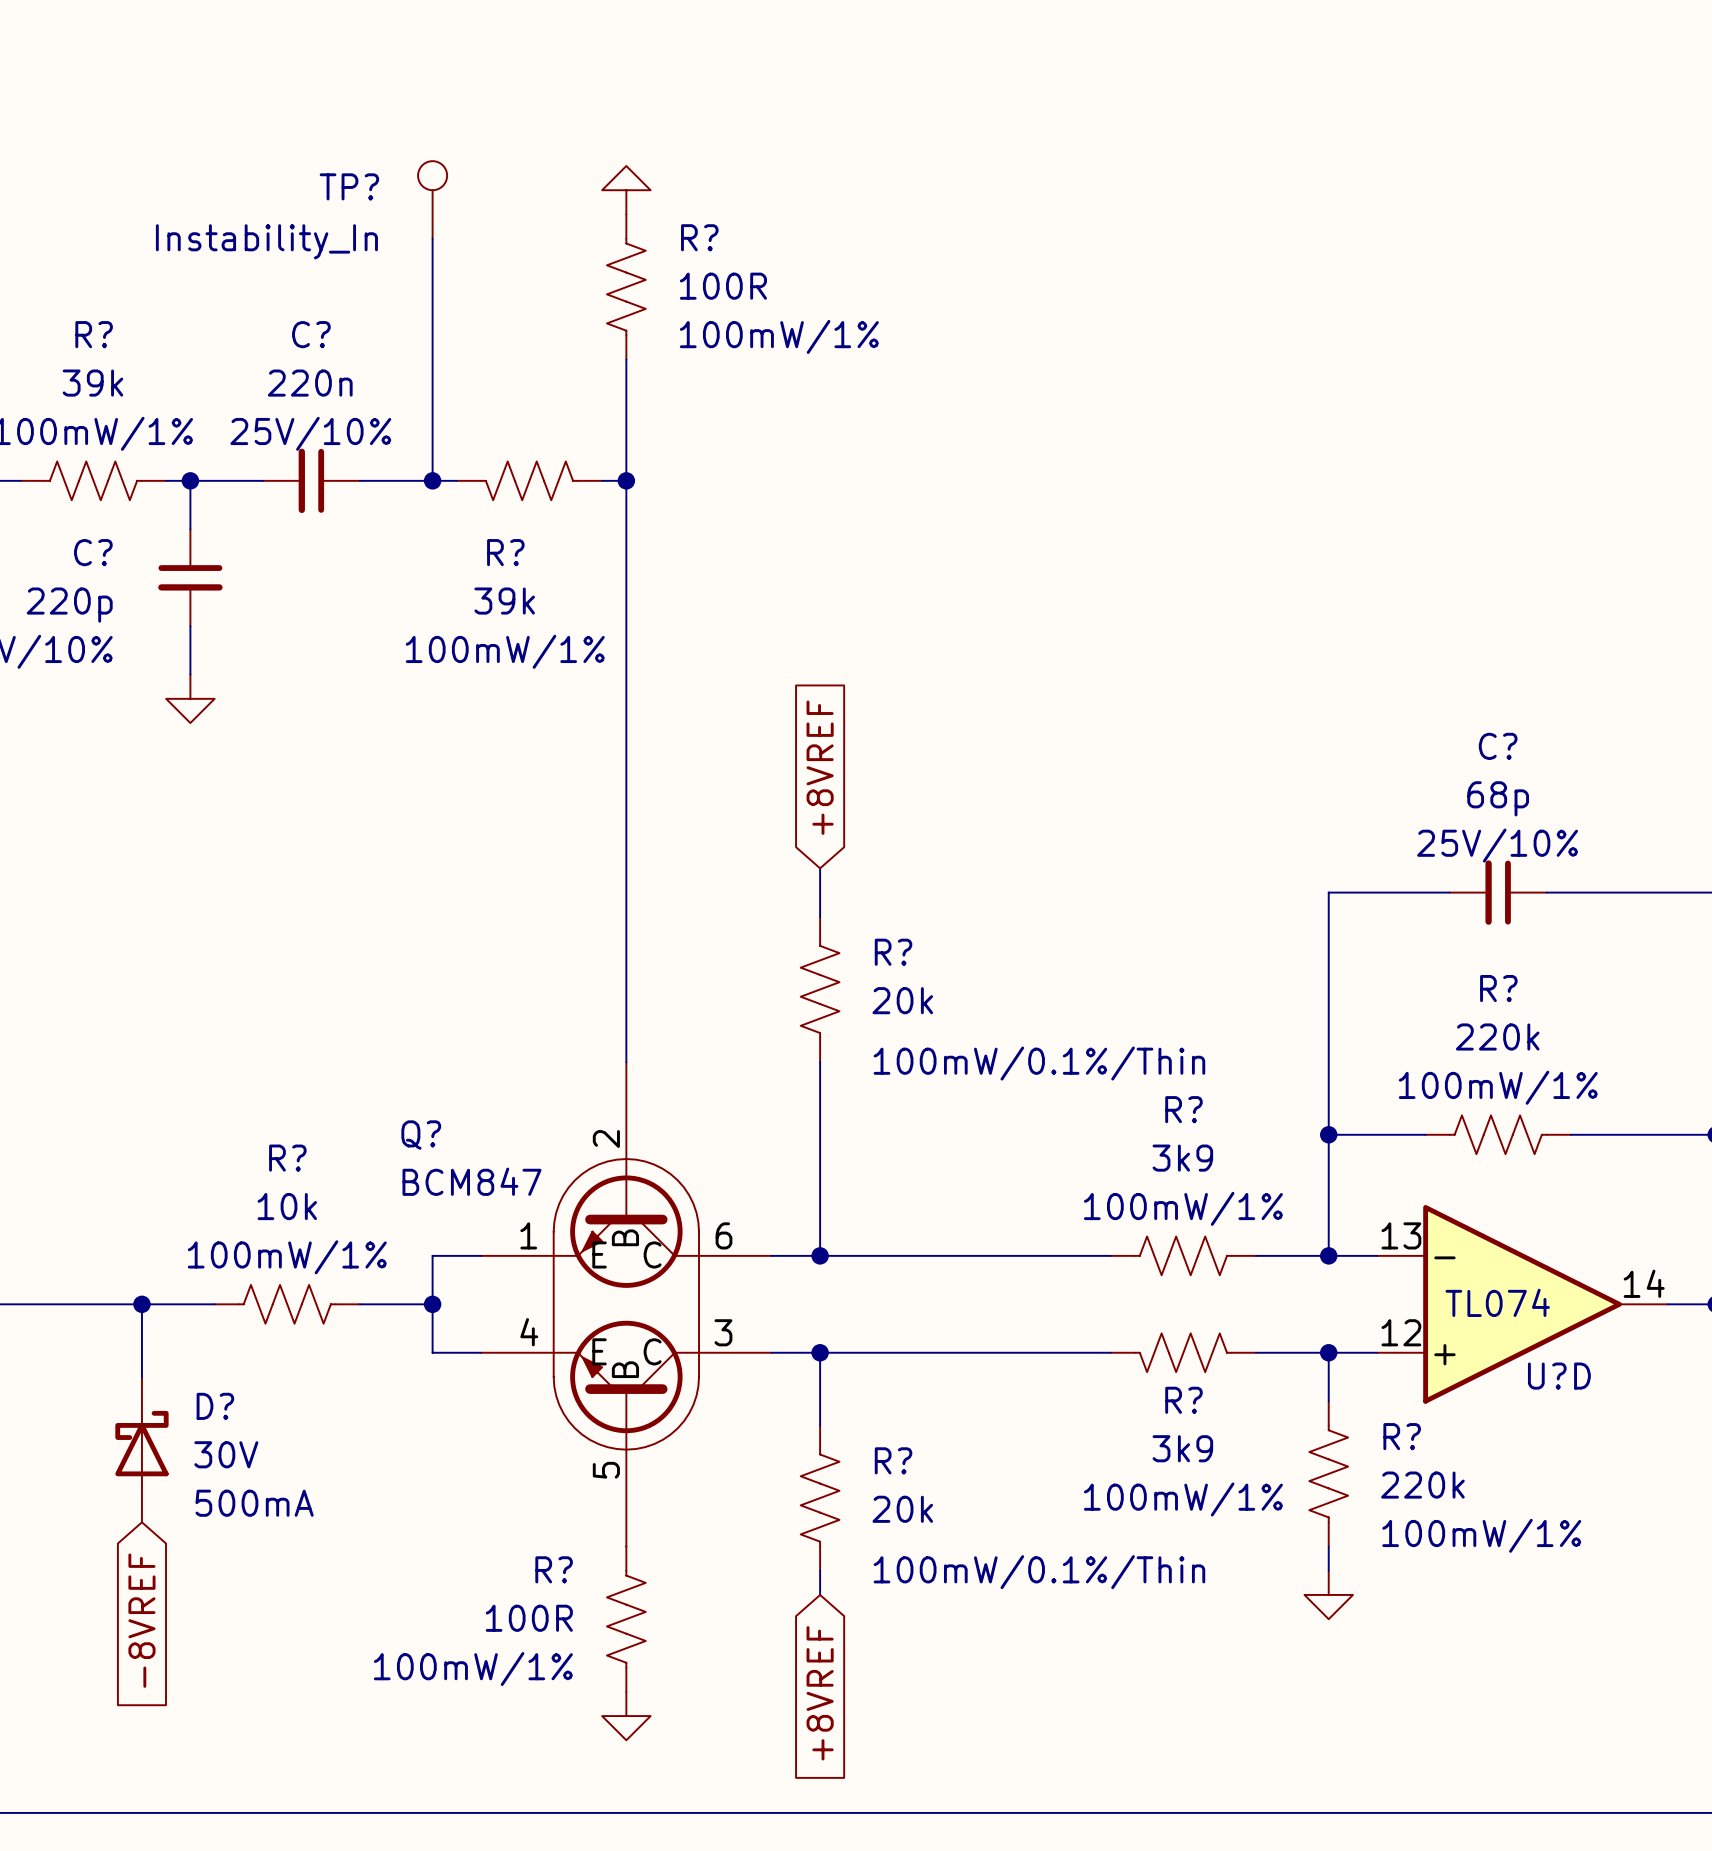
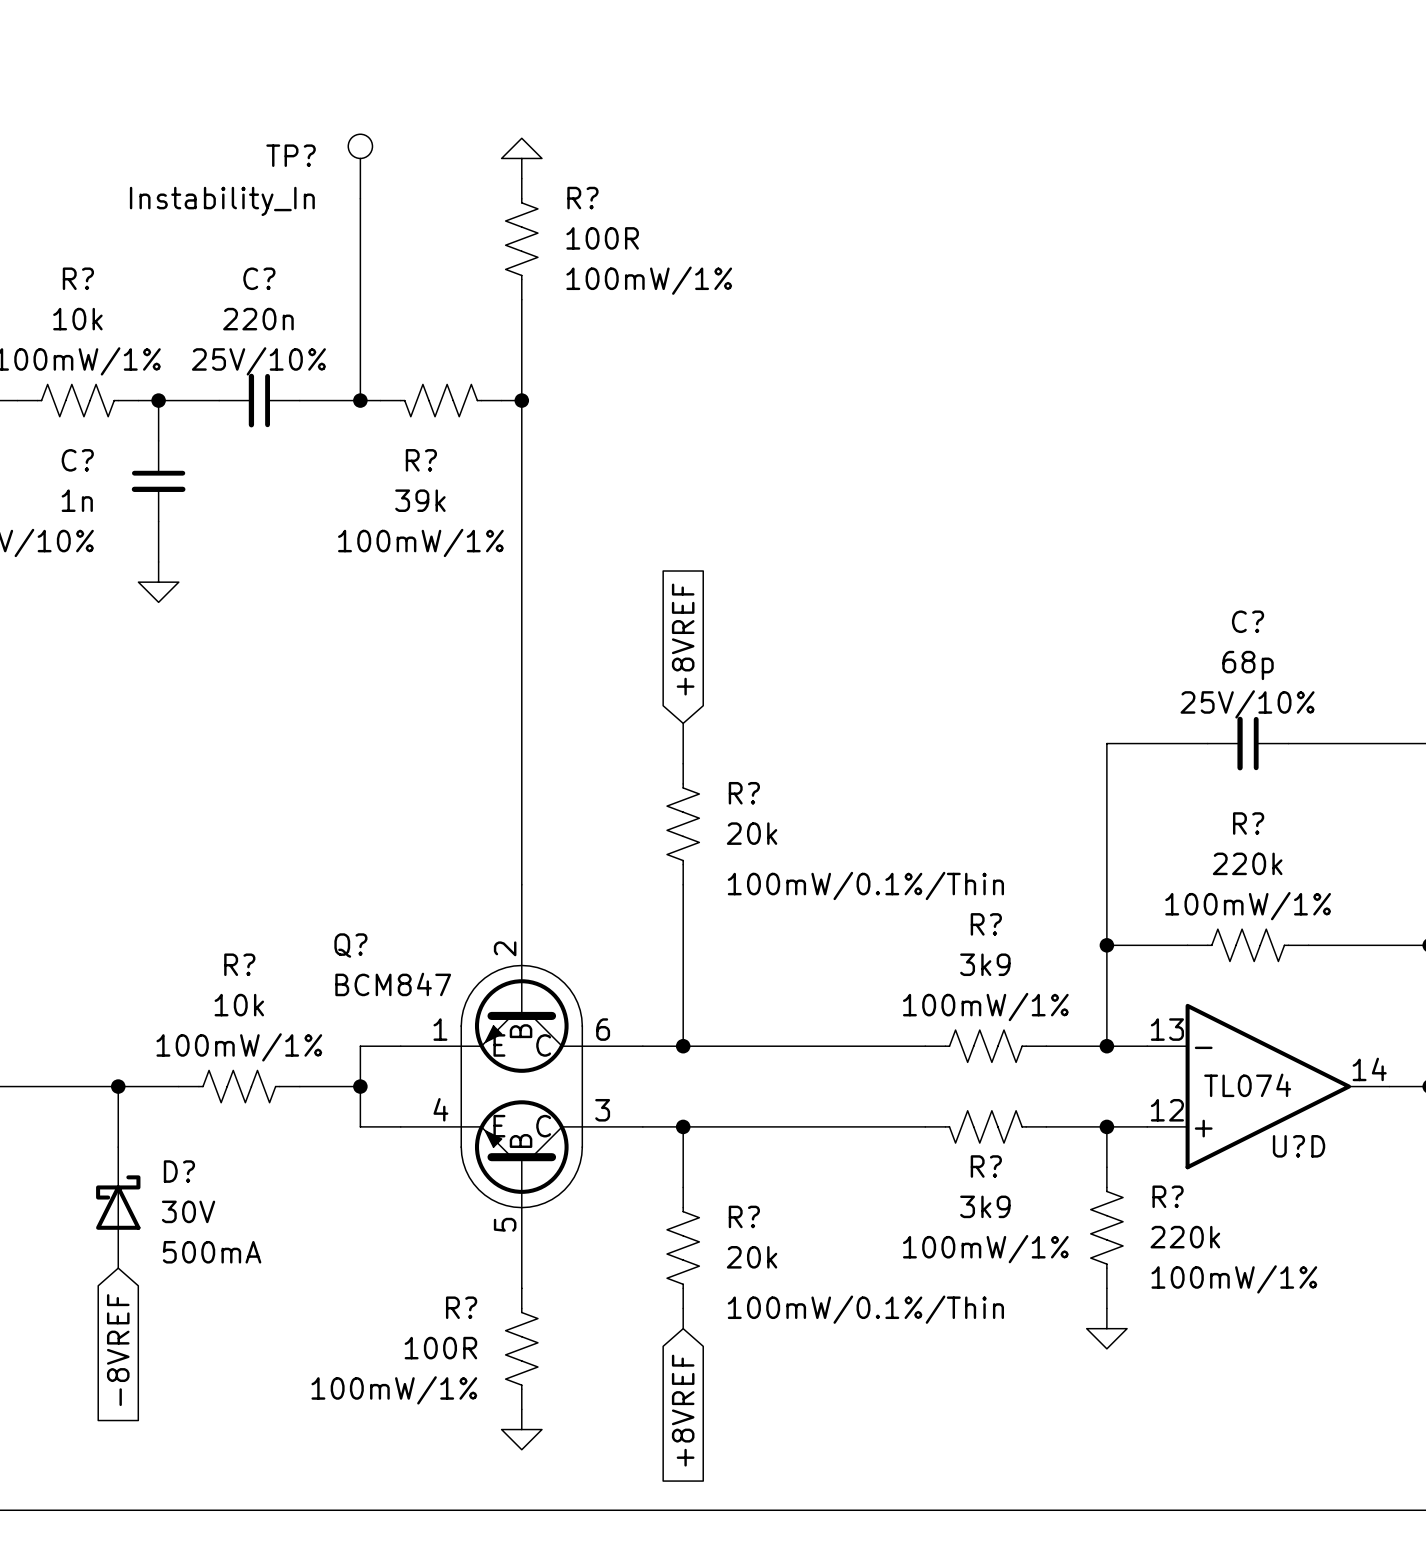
R? value: 39k (92, 383) -> 10k (77, 319)
C? value: 220p (69, 605) -> 1n (77, 500)

